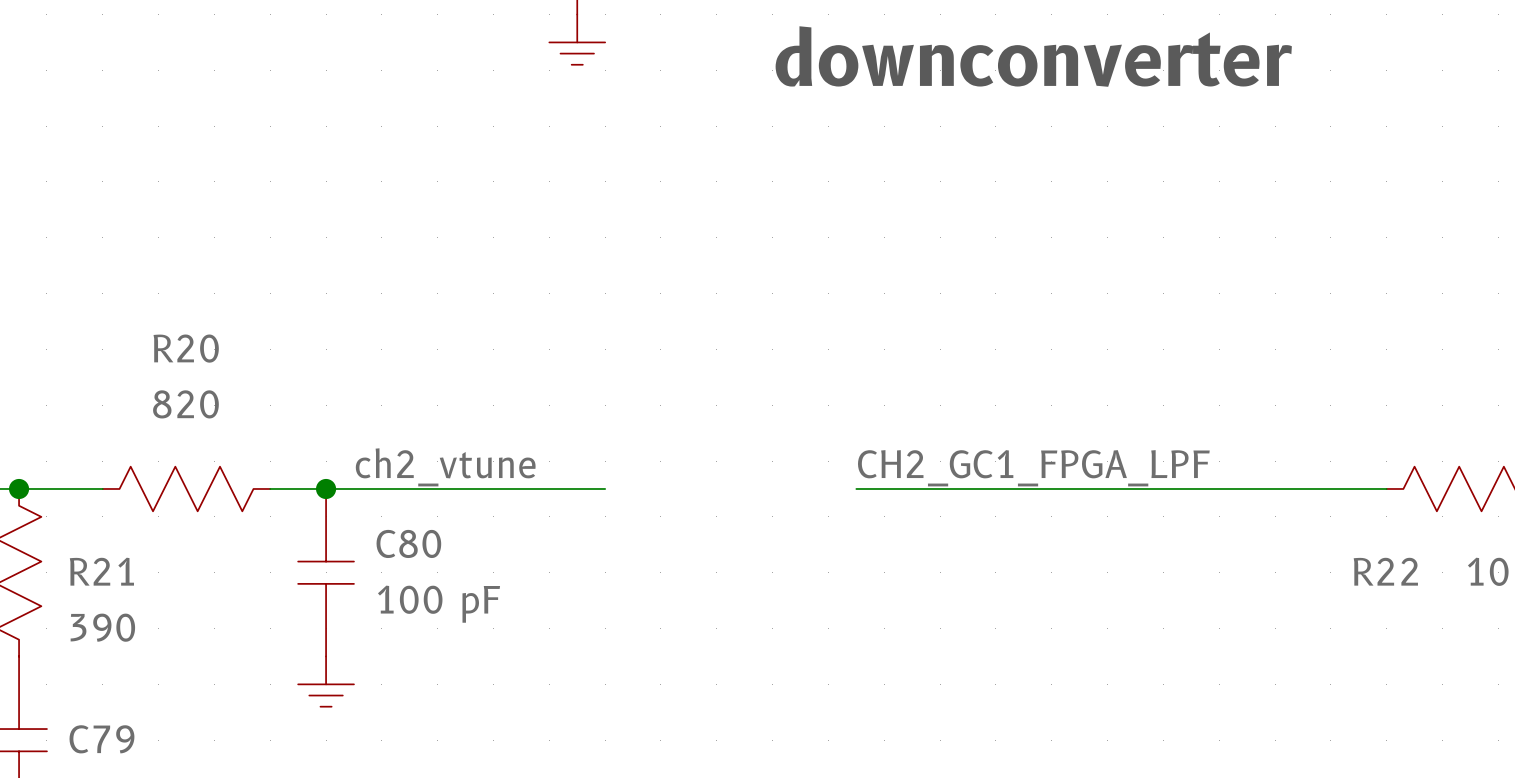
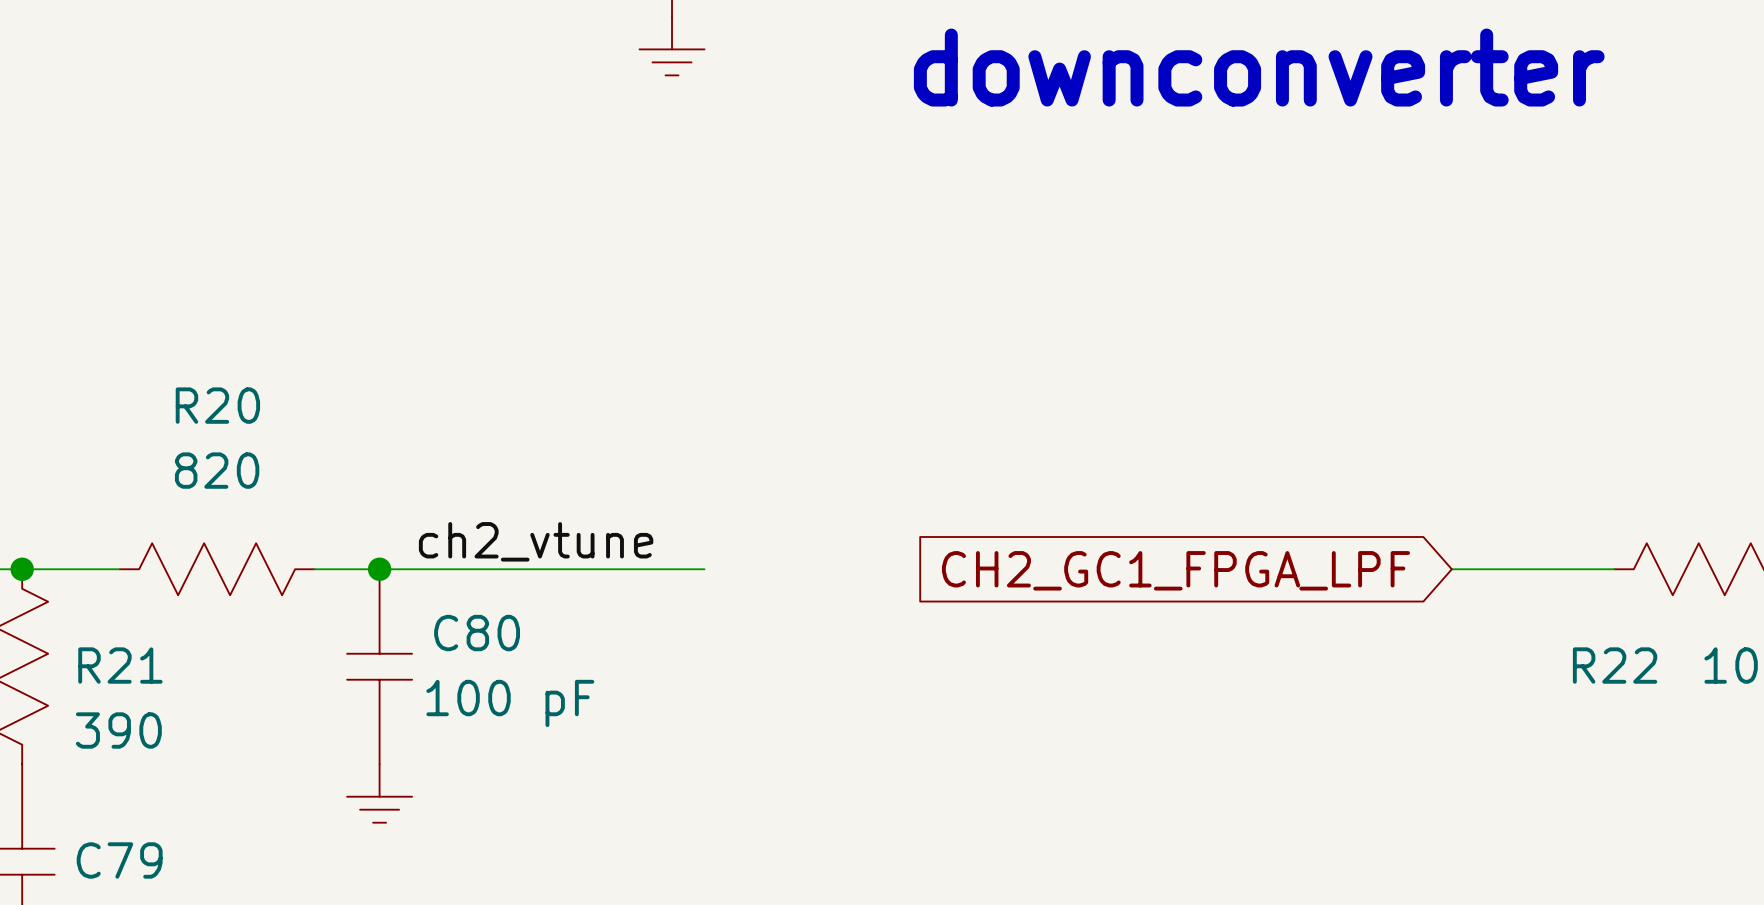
label: CH2_GC1_FPGA_LPF (1033, 468) -> none
wire: (856, 488) (1247, 488) -> none
global label: none -> CH2_GC1_FPGA_LPF (1175, 570)

